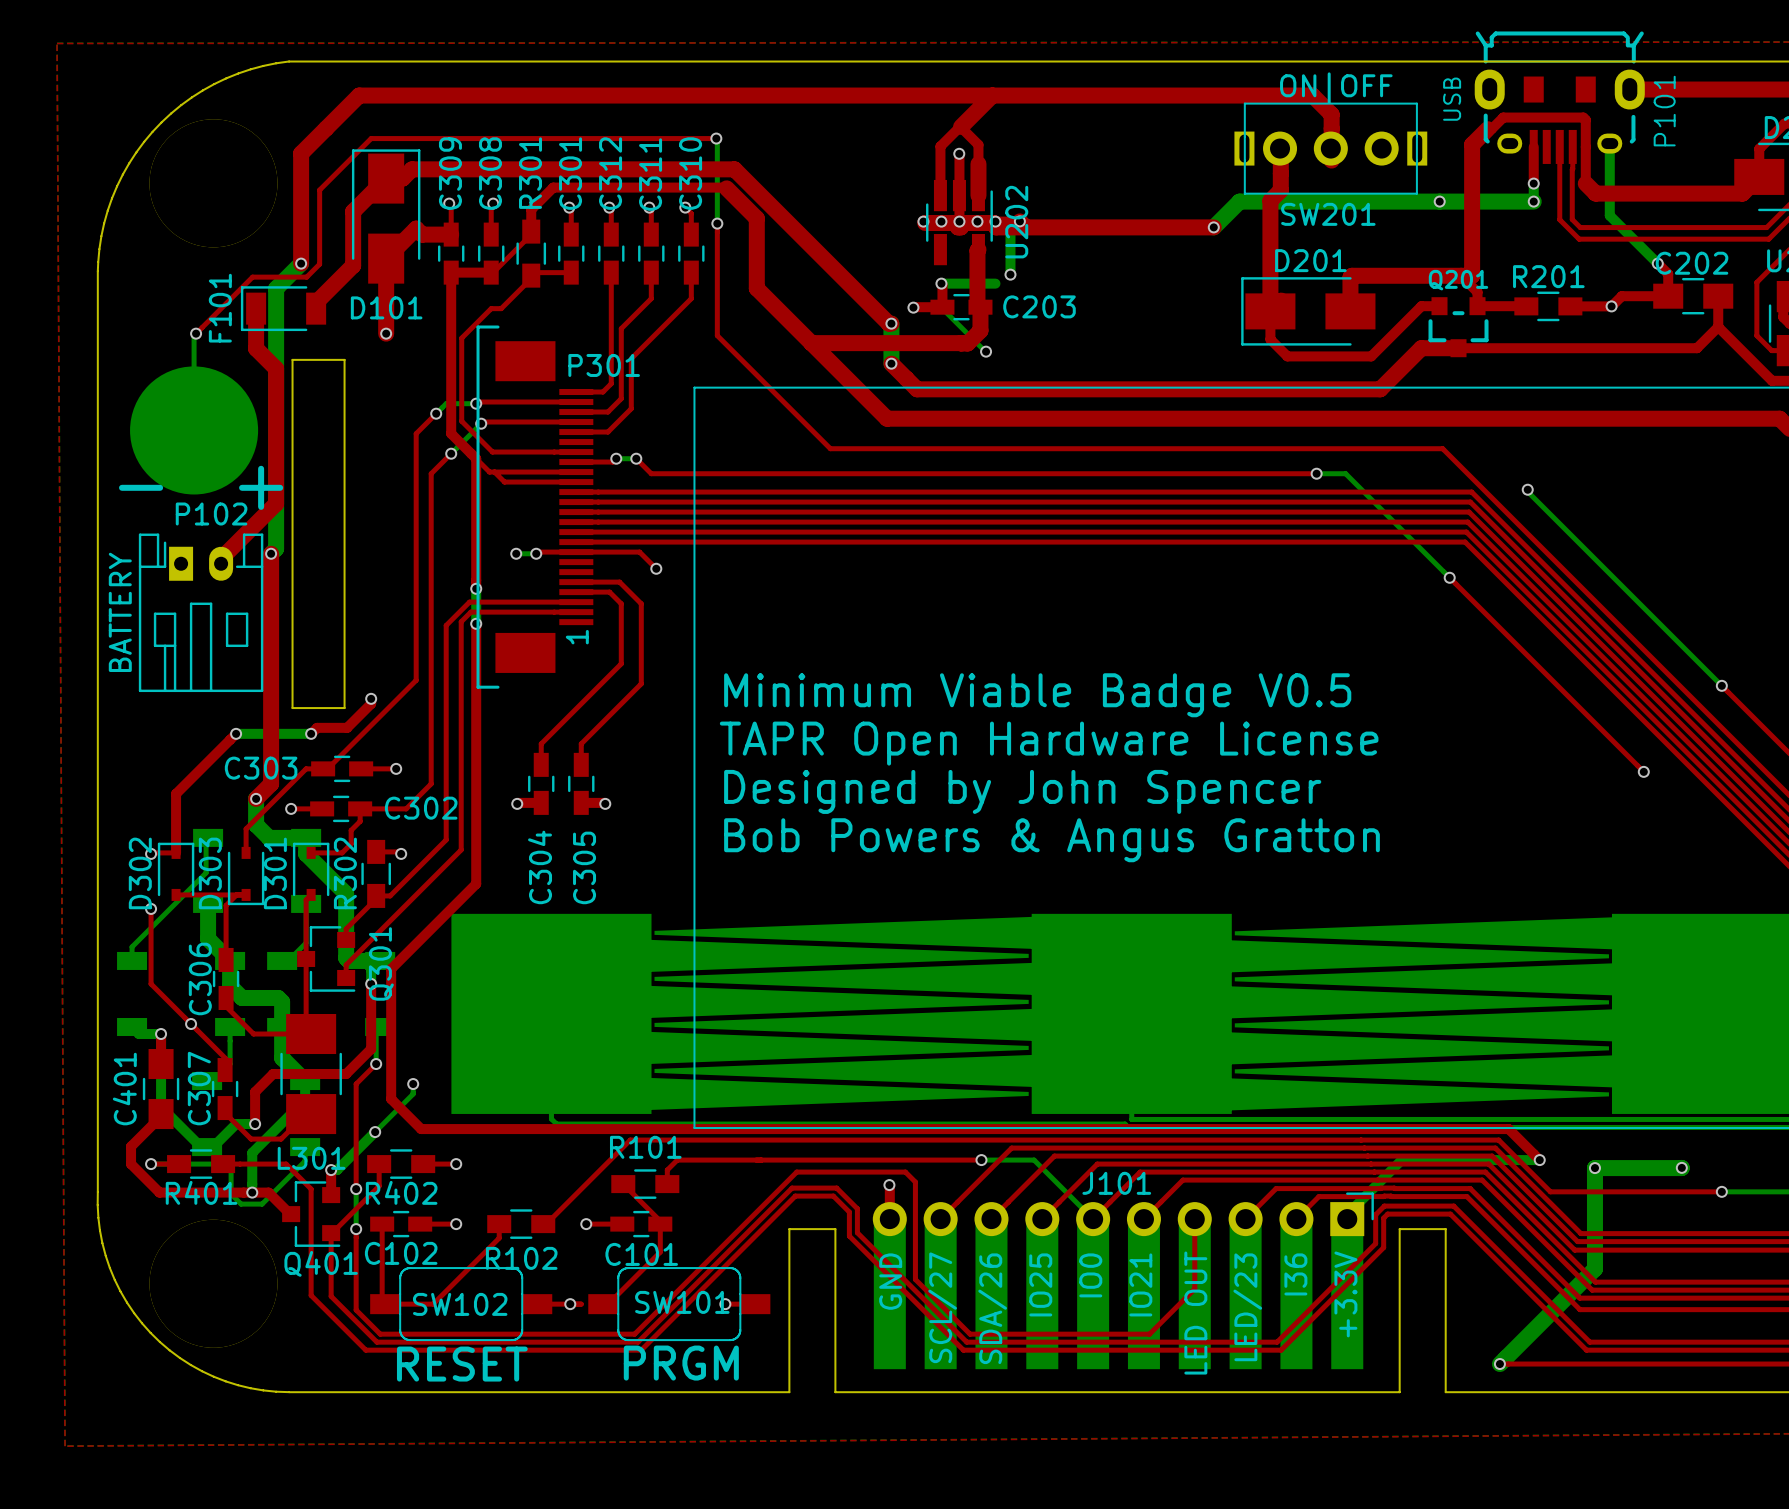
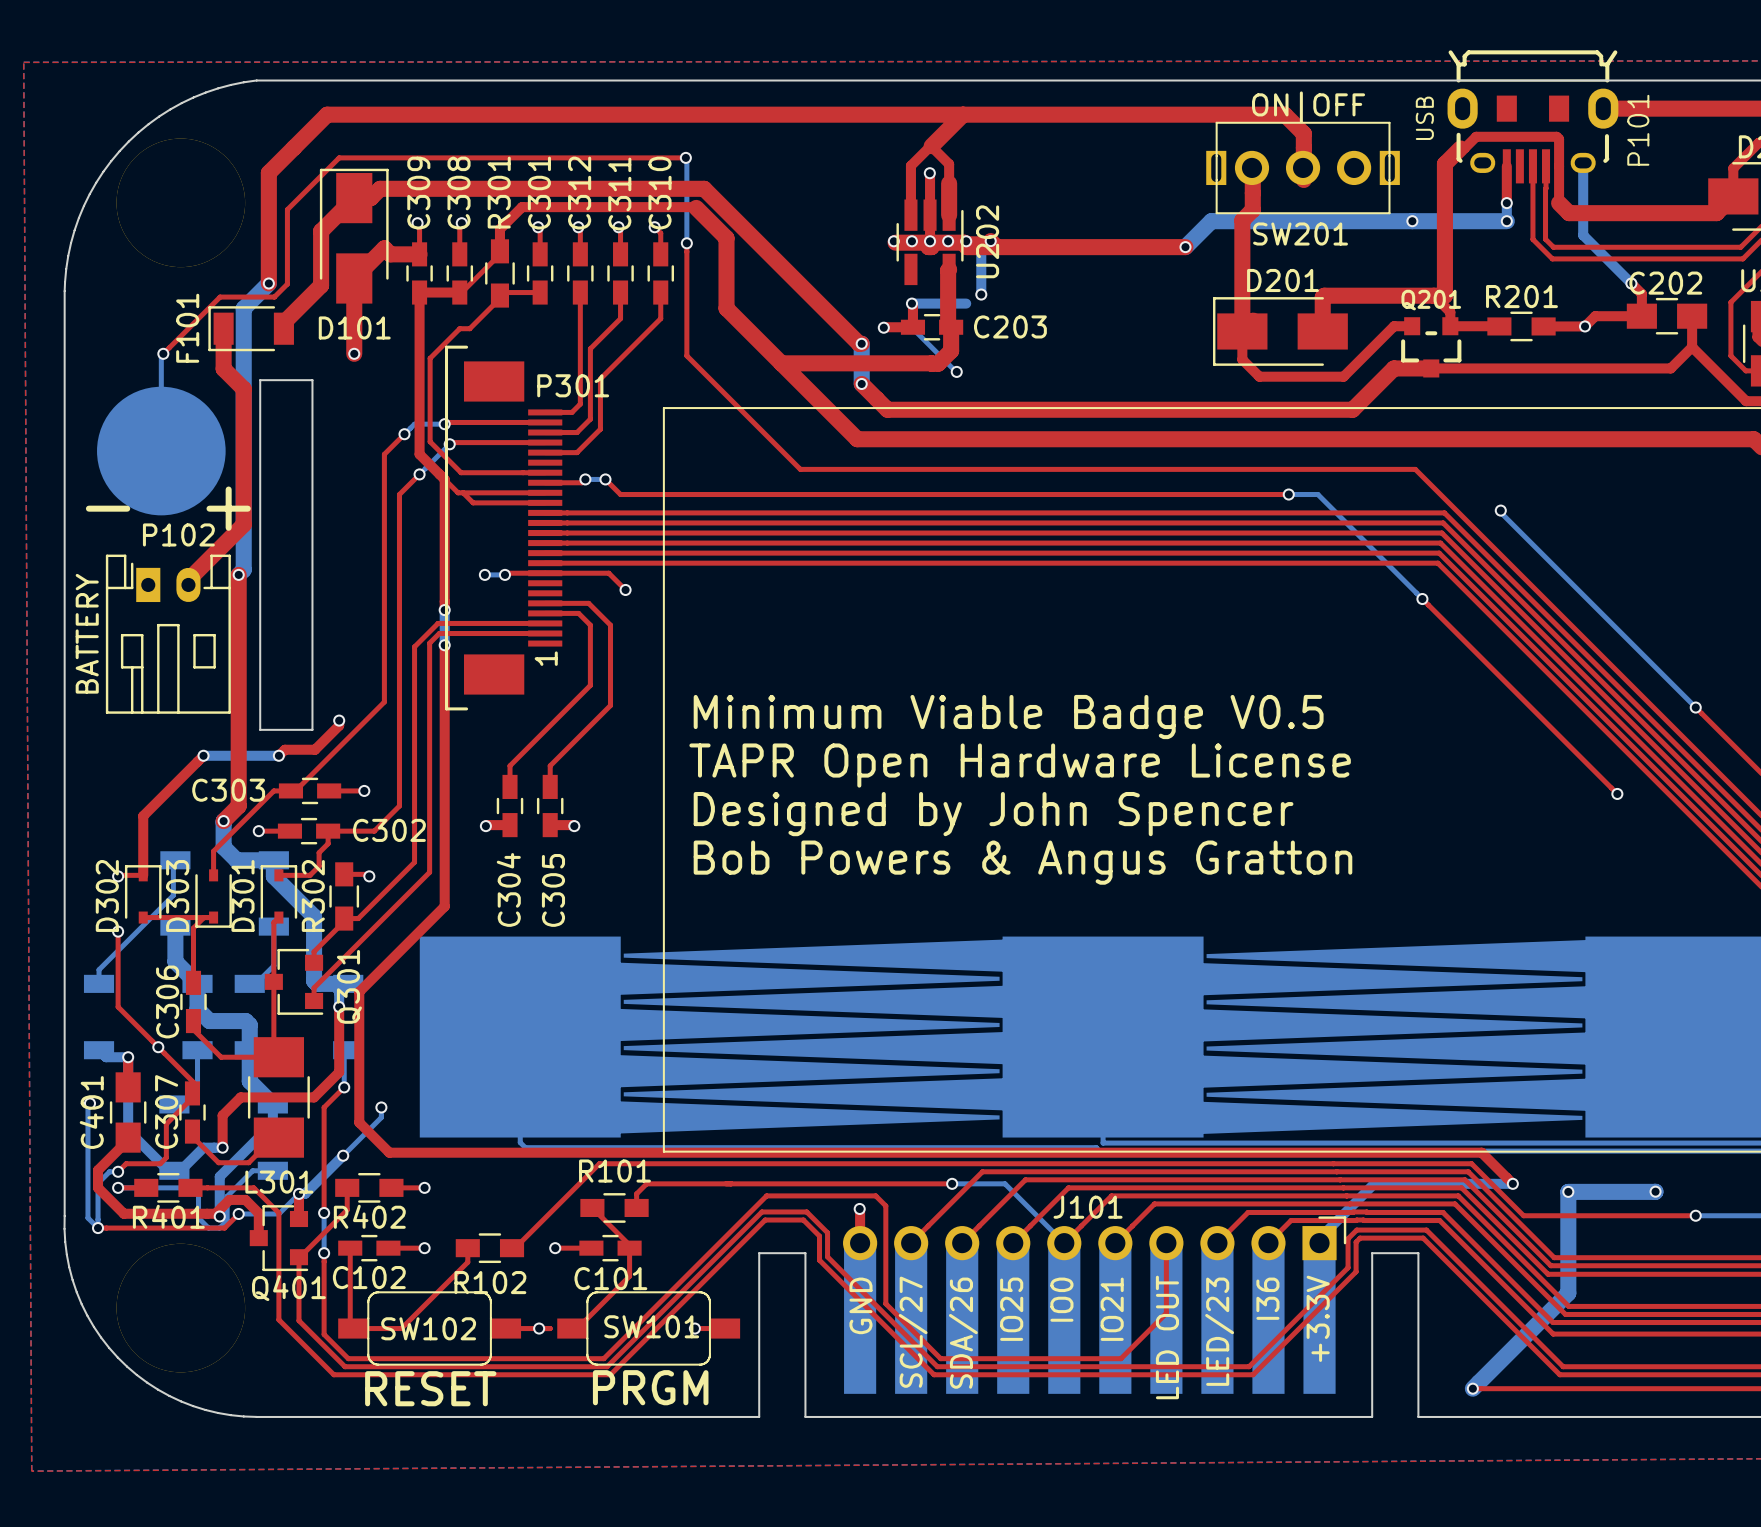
top track: none -> (192, 1093) (192, 1097) (166, 1124) (166, 1157) (160, 1163) (126, 1163) (118, 1171)
bottom track: none -> (89, 1103) (87, 1105) (87, 1218) (98, 1228) (98, 1183) (109, 1171) (118, 1171)
via: none -> (89, 1103)
bottom track: (305, 1147) (305, 1161) (262, 1204) (252, 1204) -> (272, 1170) (252, 1170) (227, 1196) (227, 1220) (219, 1228)
via: none -> (118, 1171)
bottom track: none -> (298, 1193) (278, 1213) (238, 1213)
top track: (156, 1189) (159, 1192) (268, 1192) (291, 1214) -> (123, 1213) (215, 1213) (229, 1199) (245, 1199) (258, 1213) (258, 1238)
top track: none -> (238, 1213) (224, 1228) (98, 1228)
via: none -> (238, 1213)
via: none -> (98, 1228)

